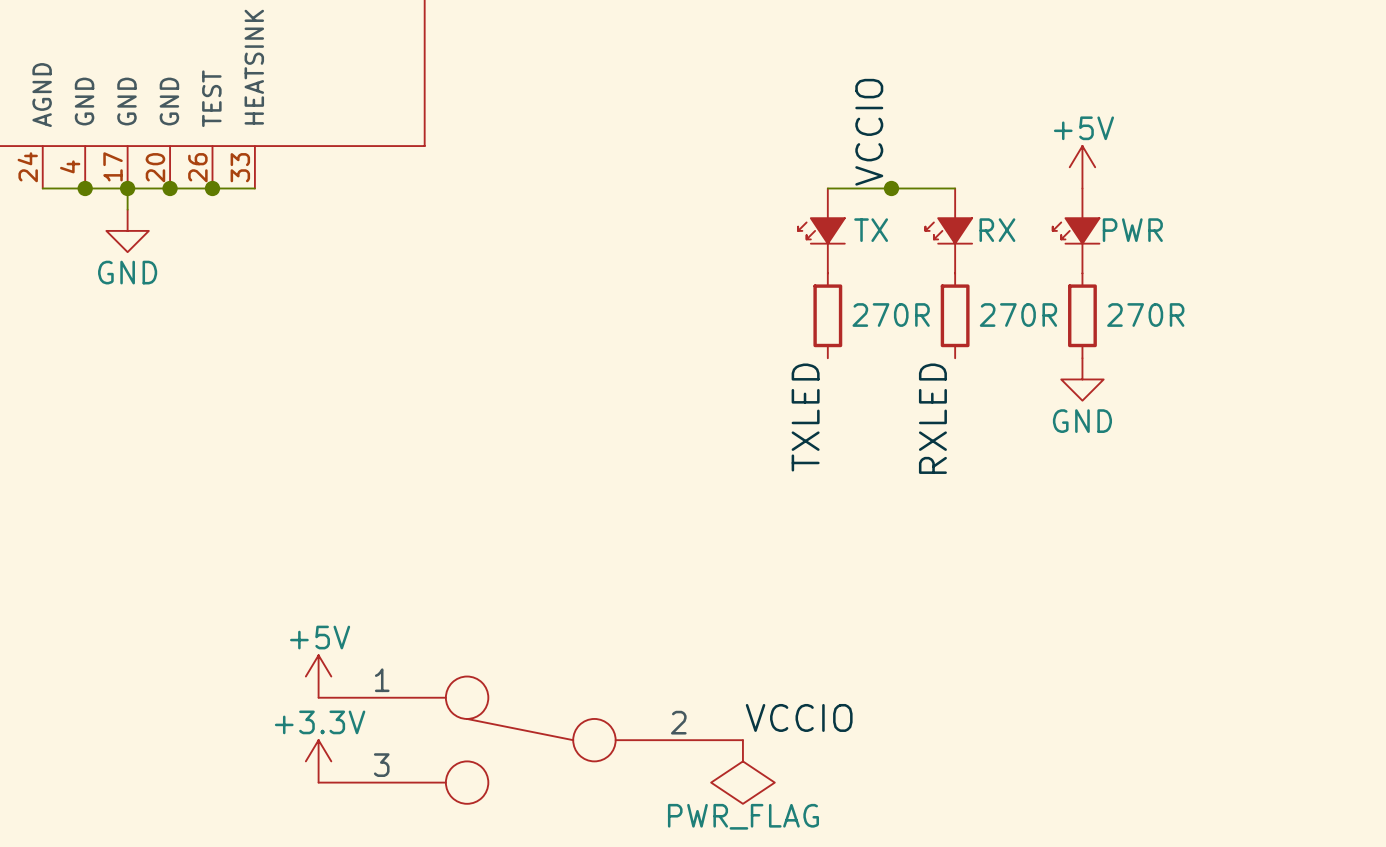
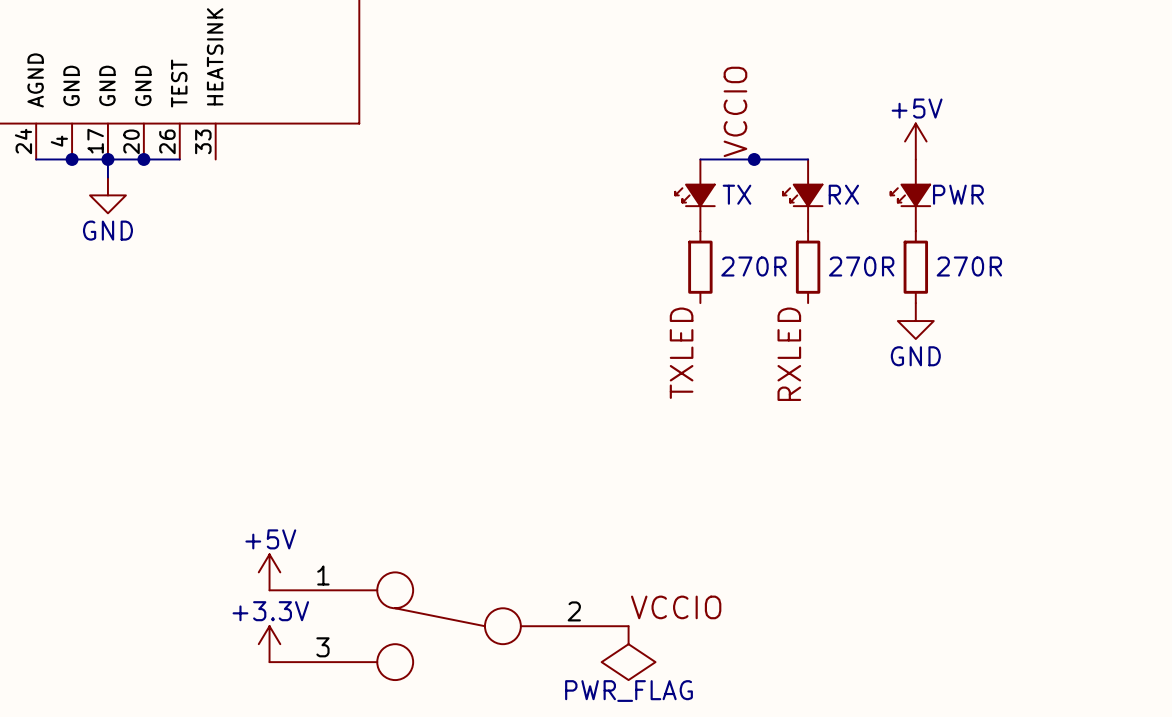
wire: (212, 188) (254, 188) -> none
junction: (212, 188) -> none

